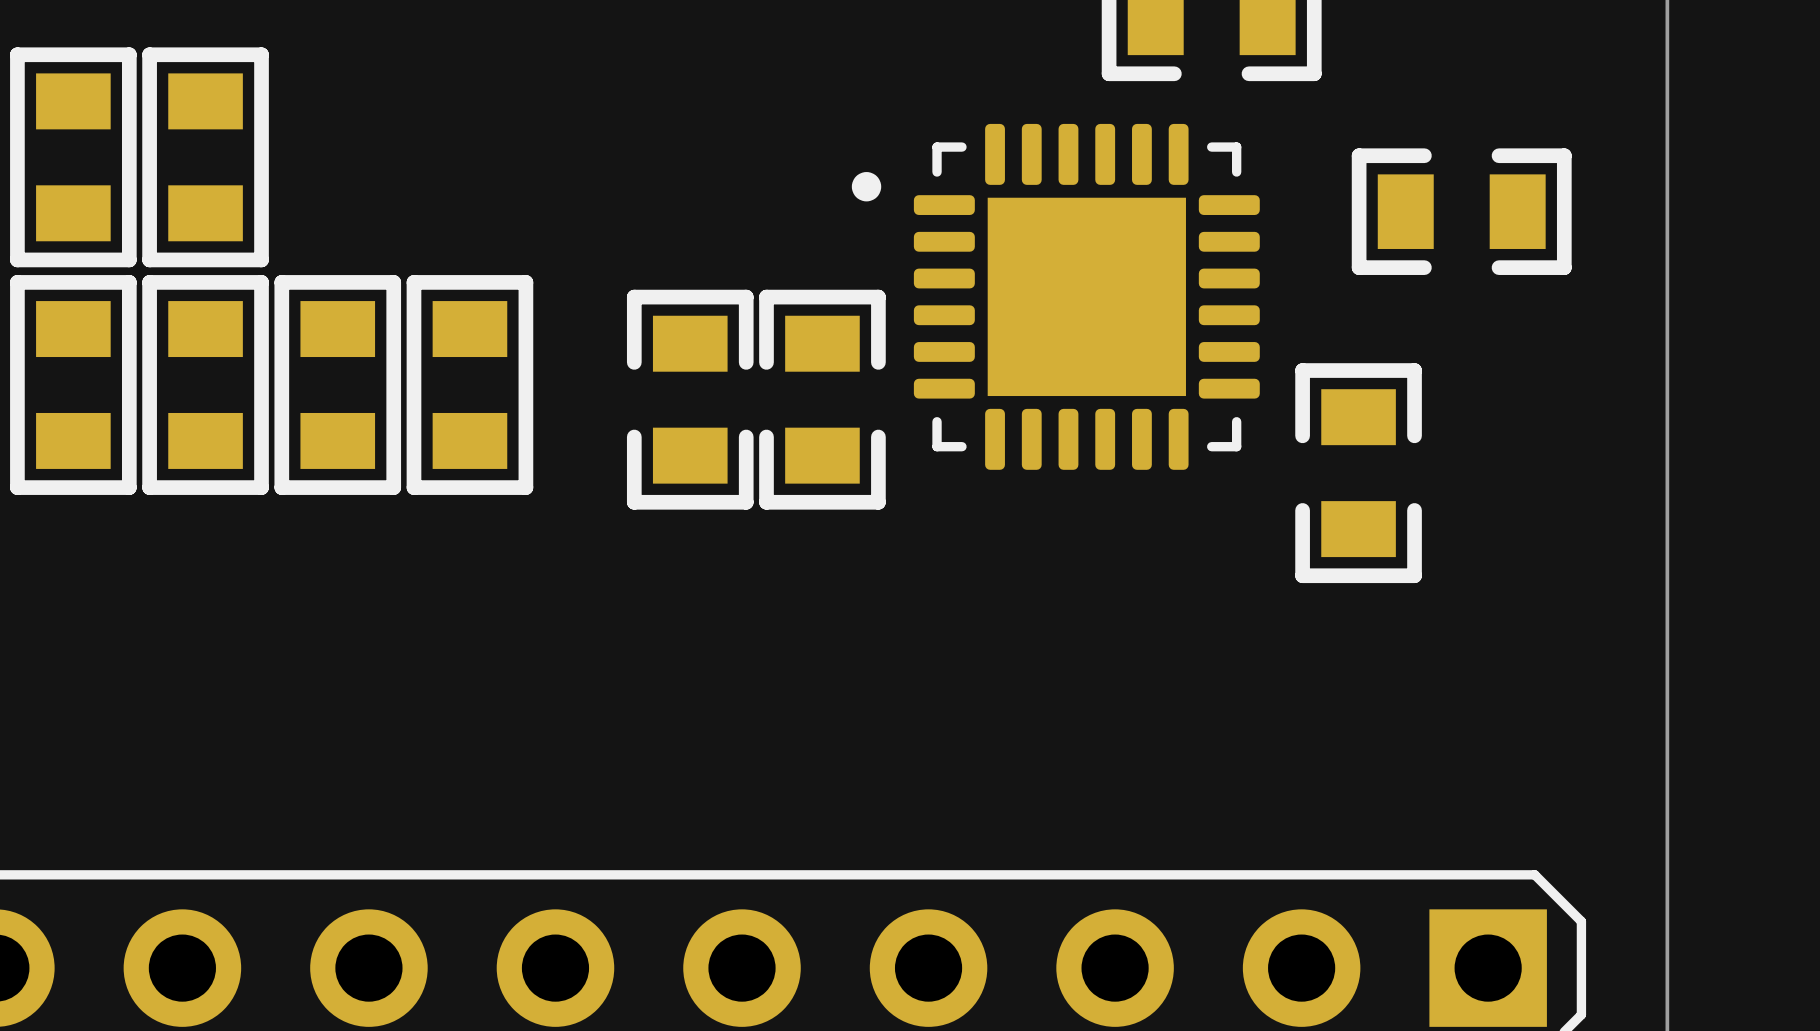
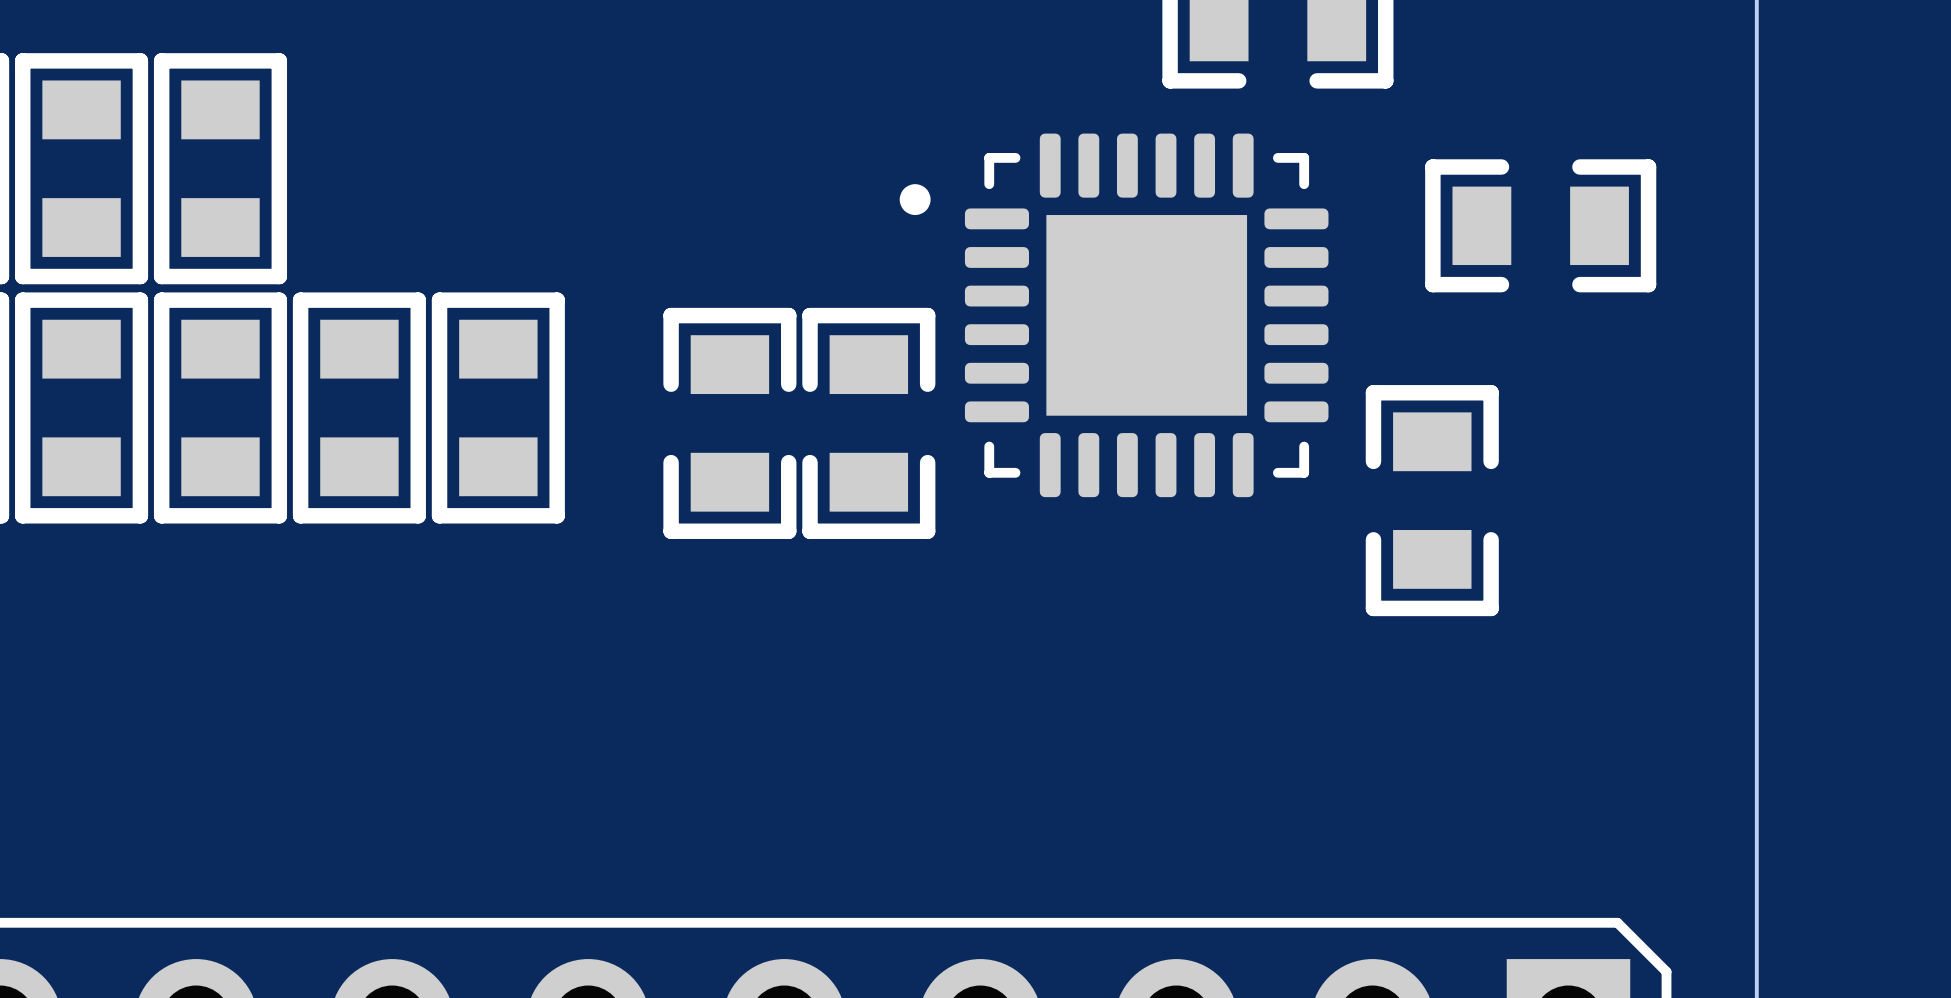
part footprint: [851, 123, 1260, 470] -> [899, 133, 1329, 498]

